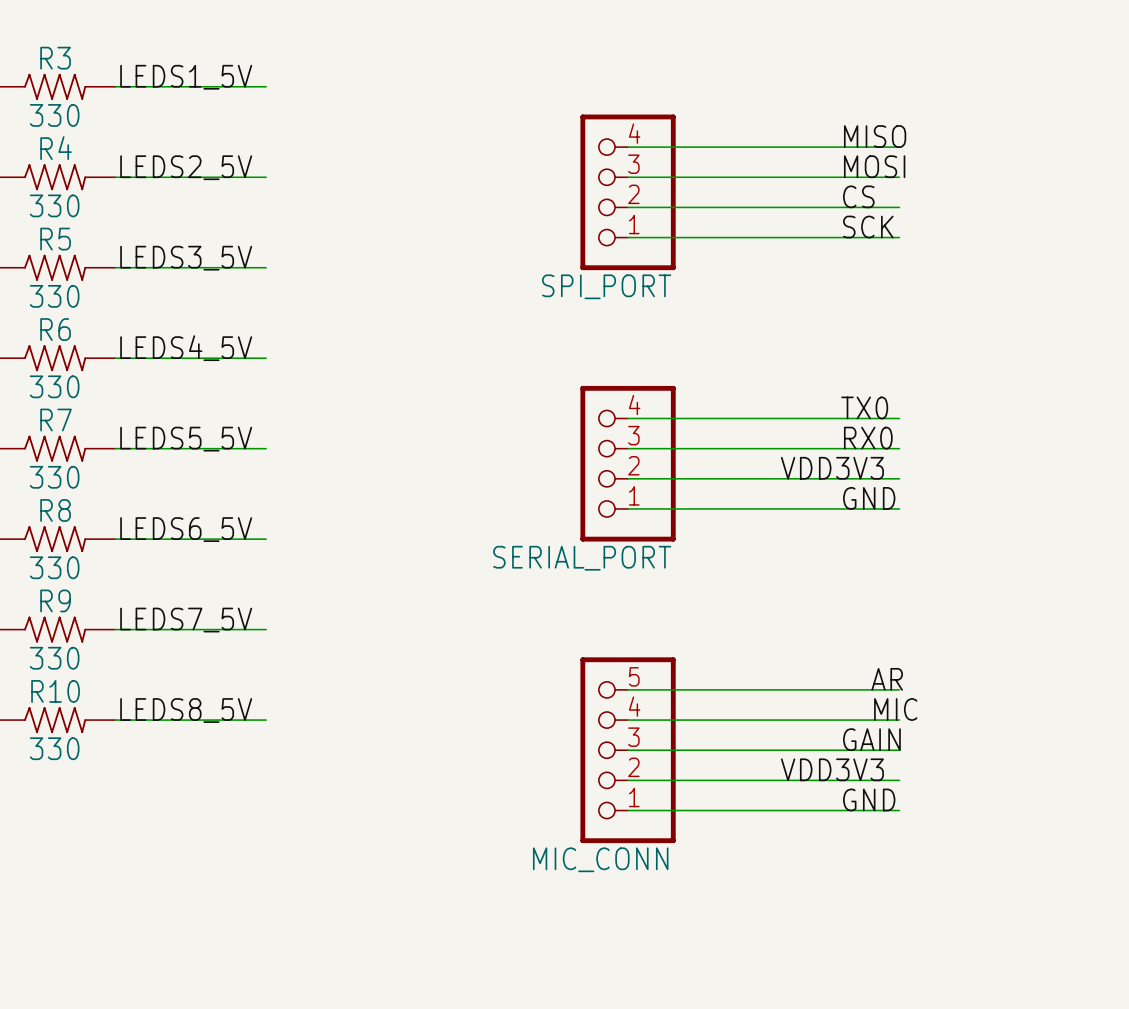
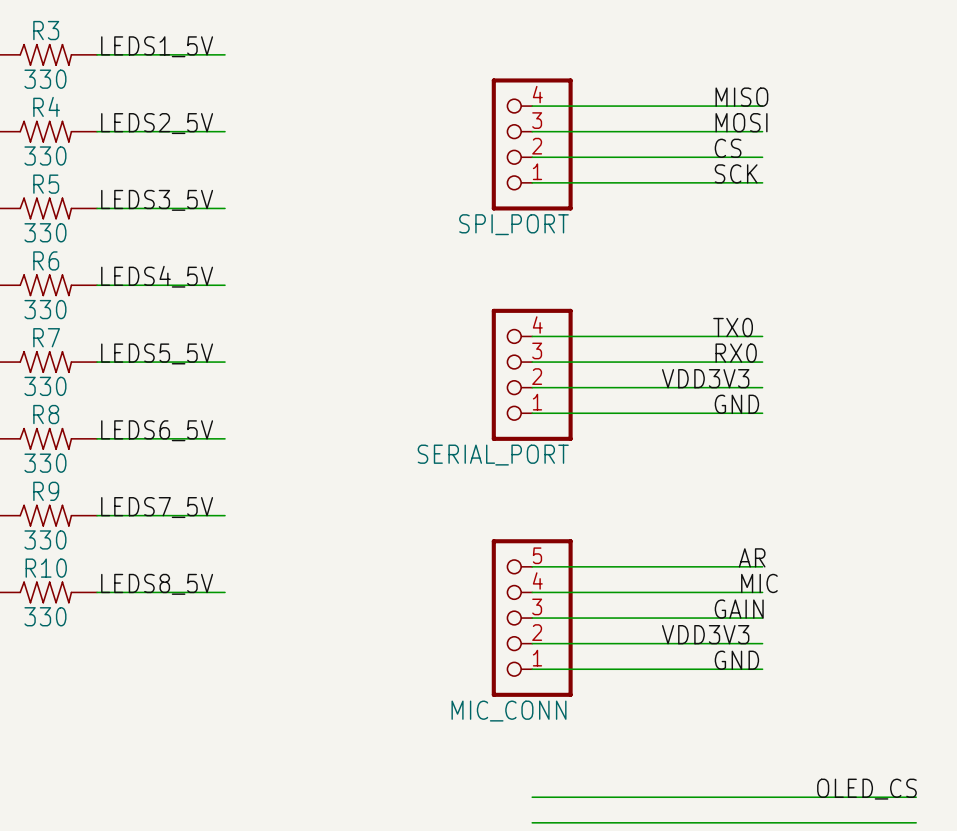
label: none -> OLED_CS (866, 789)
wire: none -> (532, 797) (916, 797)
wire: none -> (532, 822) (916, 822)

